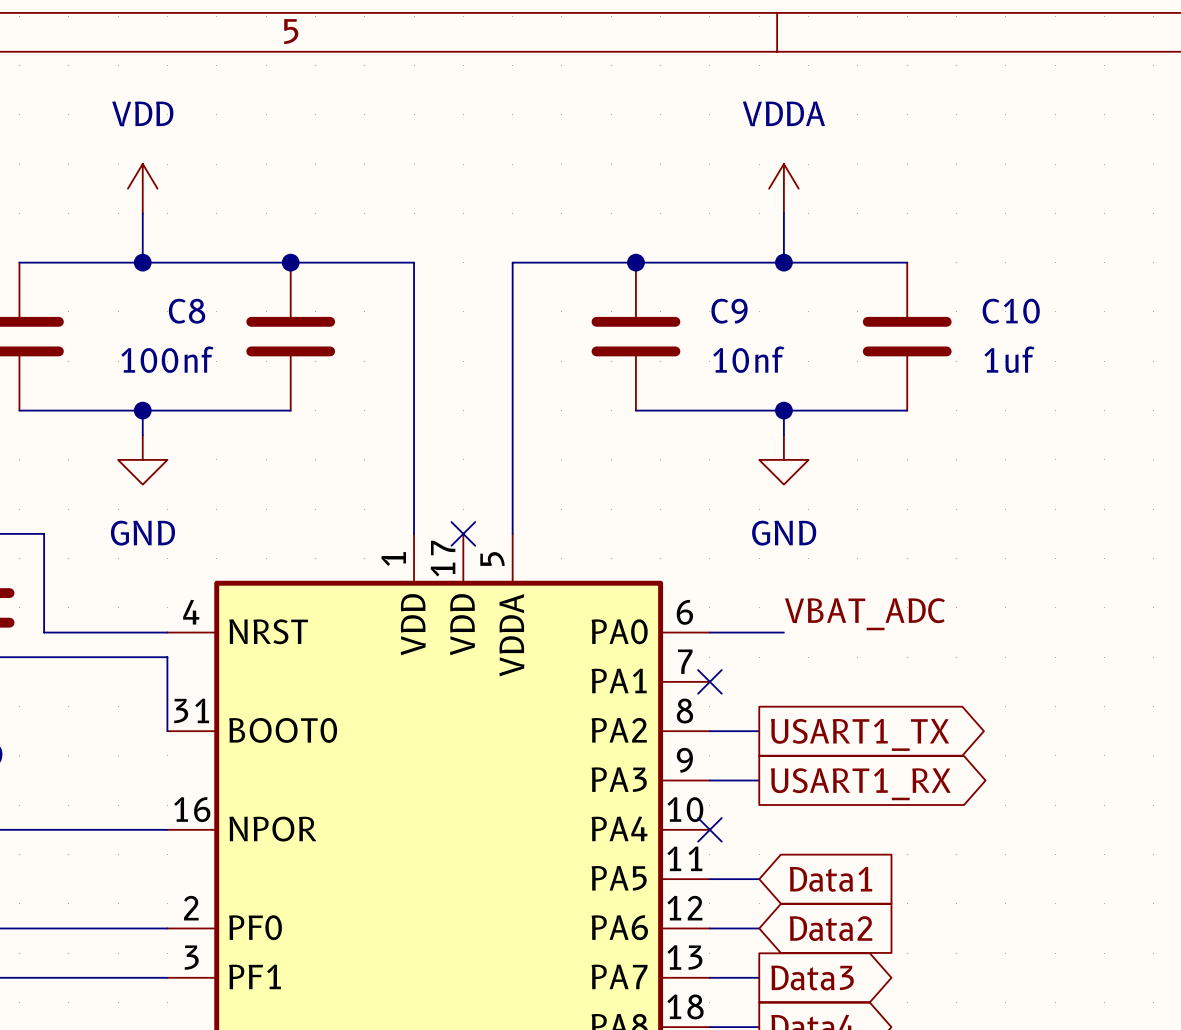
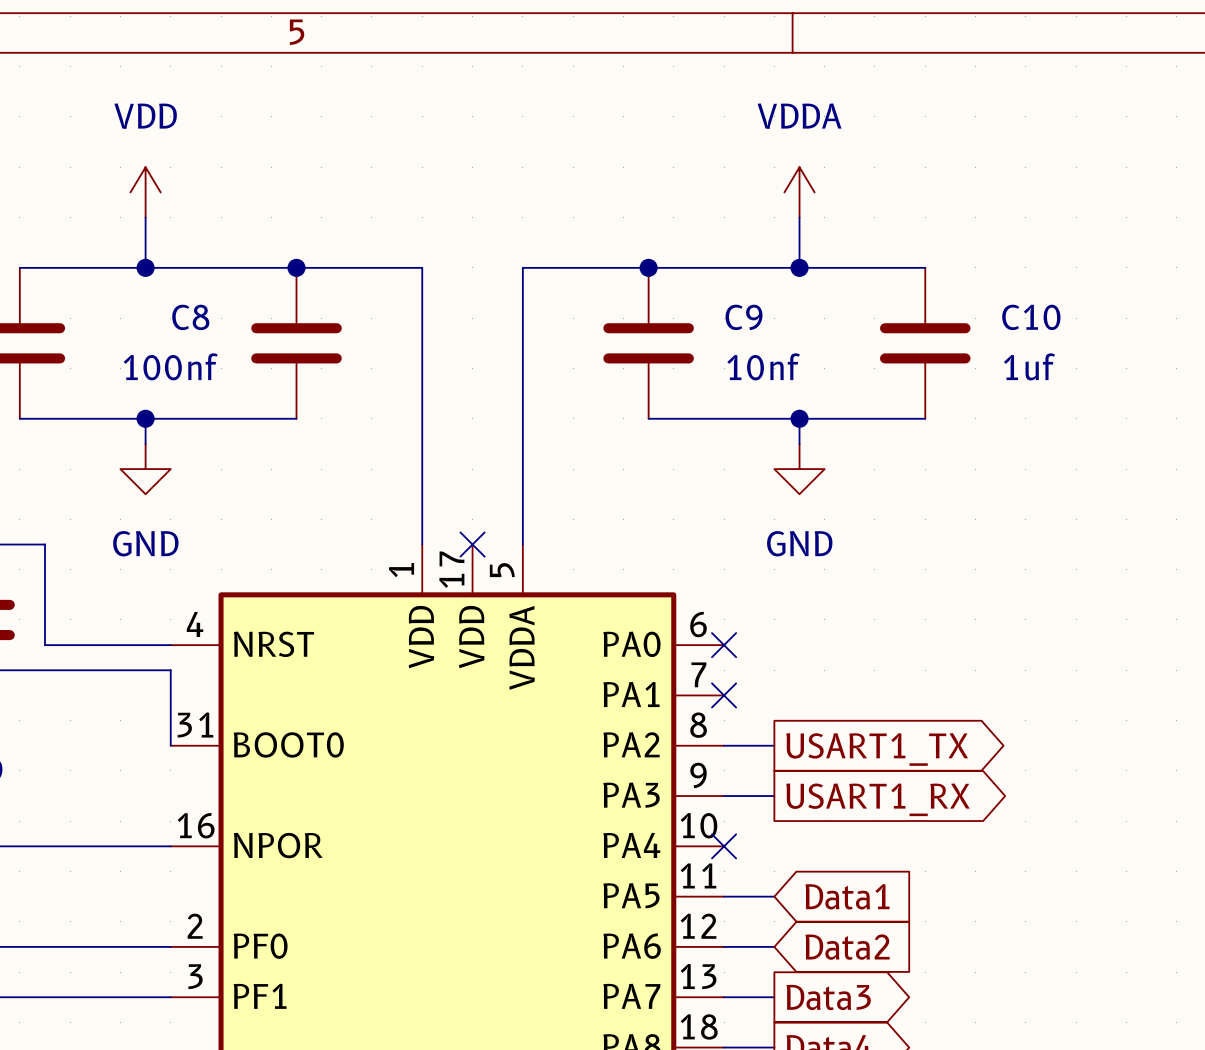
label: VBAT_ADC (864, 614) -> none
wire: (709, 632) (783, 632) -> none
no-connect mark: none -> (724, 645)

